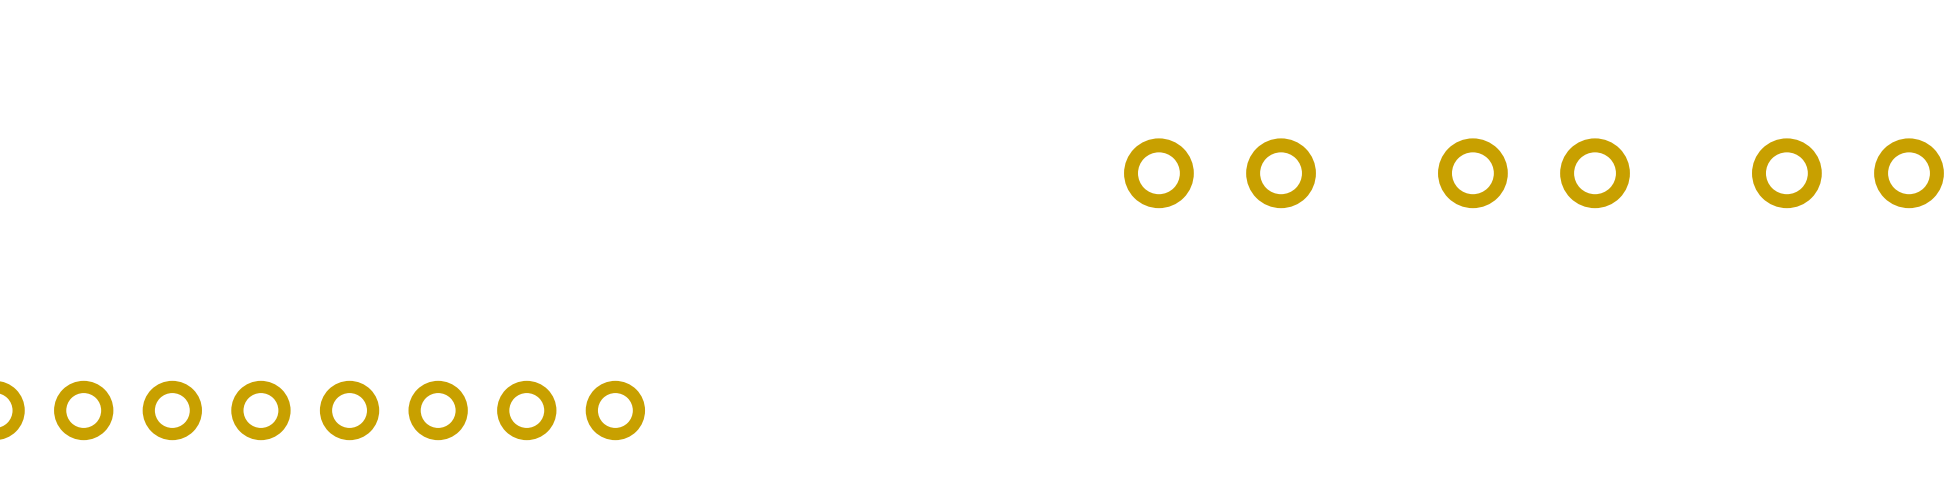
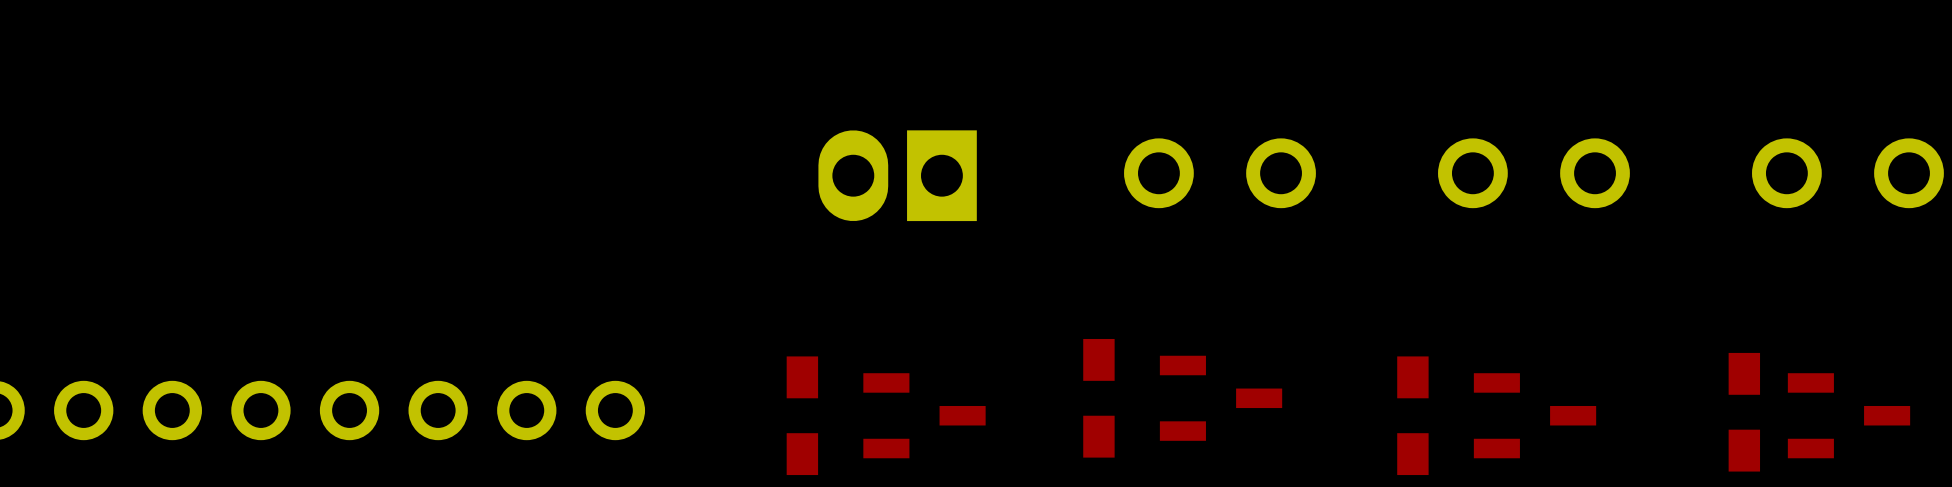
part: none -> (897, 175)
part: none -> (1098, 398)
part: none -> (1221, 398)
part: none -> (1744, 412)
part: none -> (802, 415)
part: none -> (924, 415)
part: none -> (1412, 415)
part: none -> (1535, 415)
part: none -> (1848, 415)

